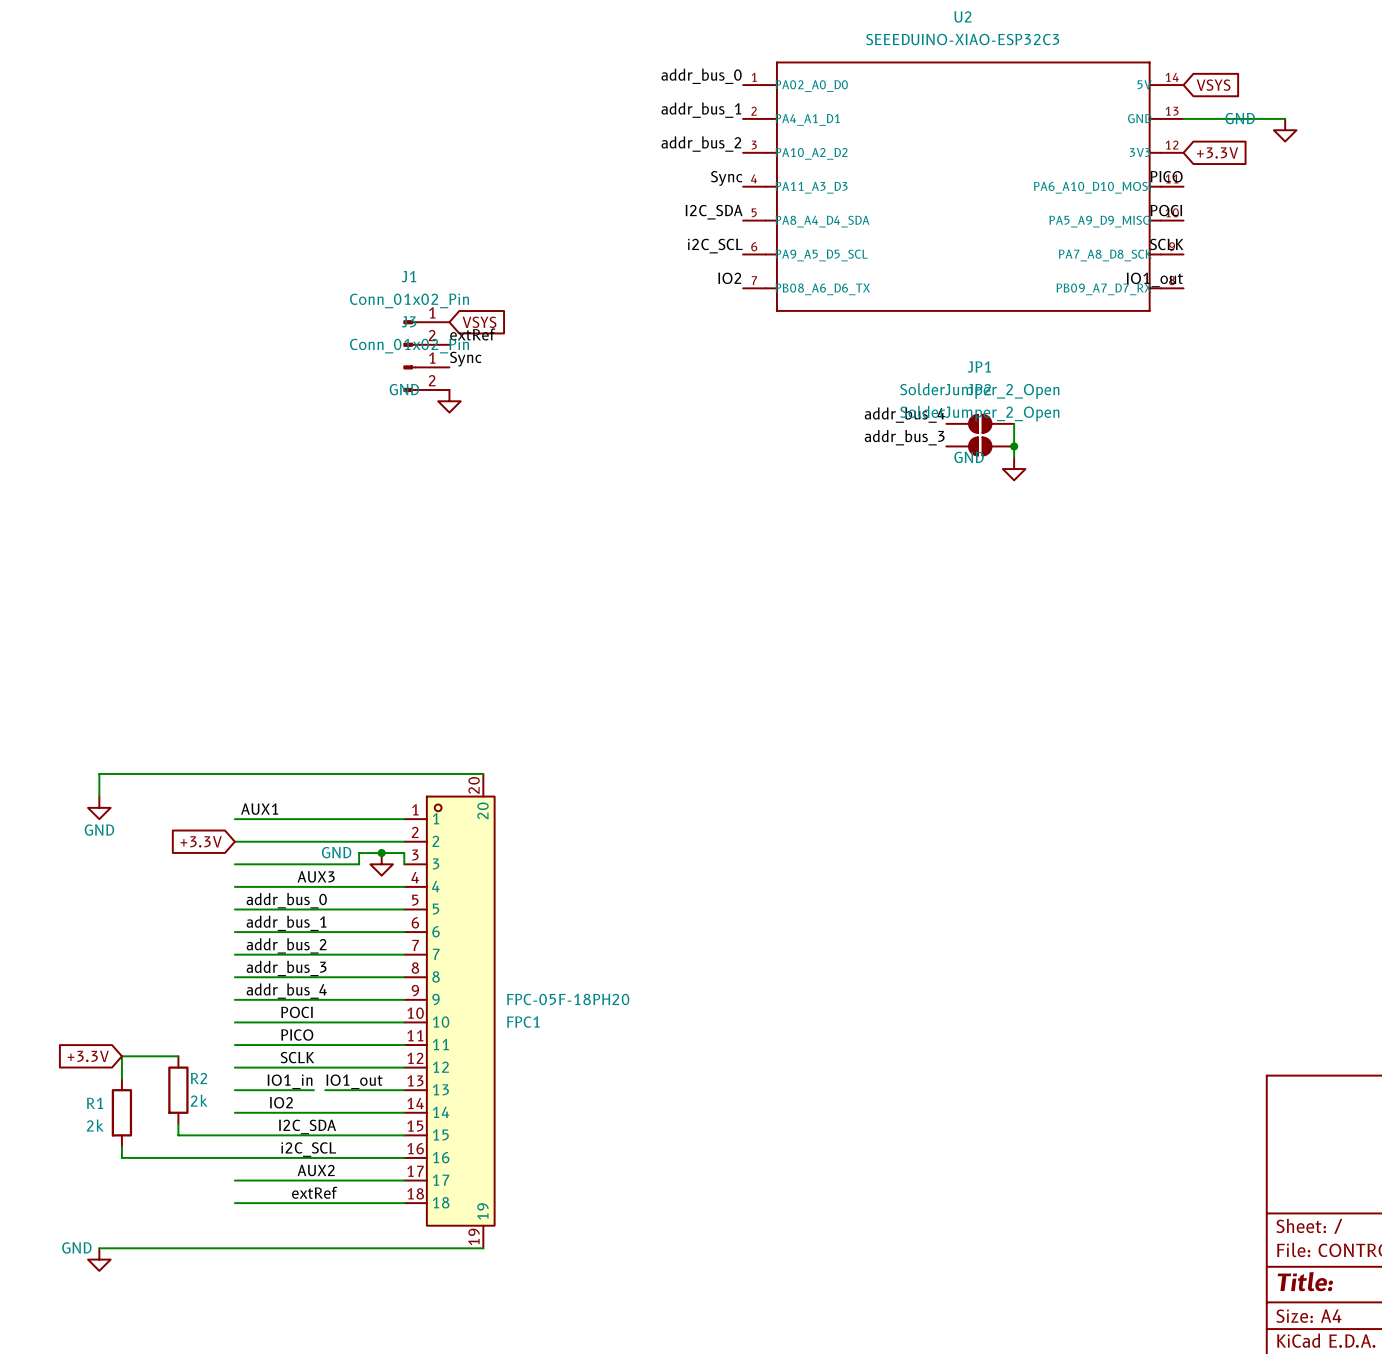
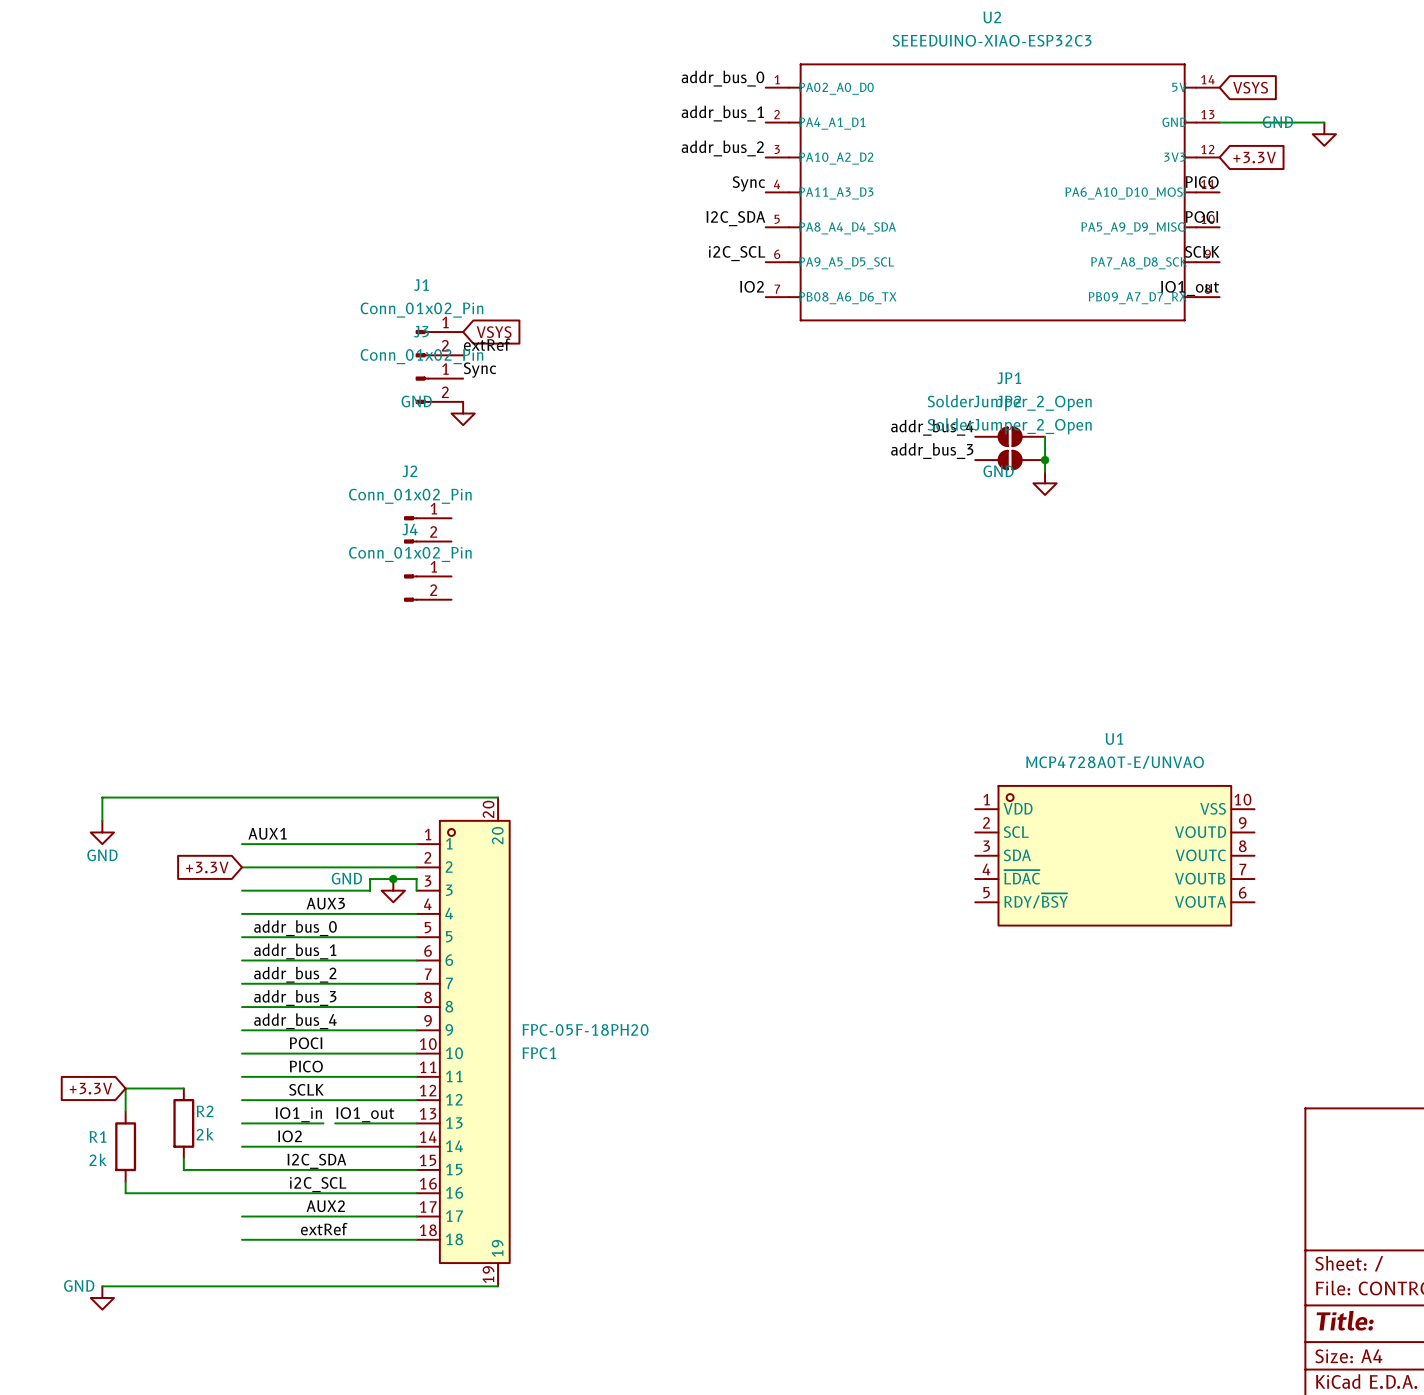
J2: none -> Conn_01x02_Pin (427, 529)
J4: none -> Conn_01x02_Pin (427, 588)
U1: none -> MCP4728A0T-E/UNVAO (1114, 855)

